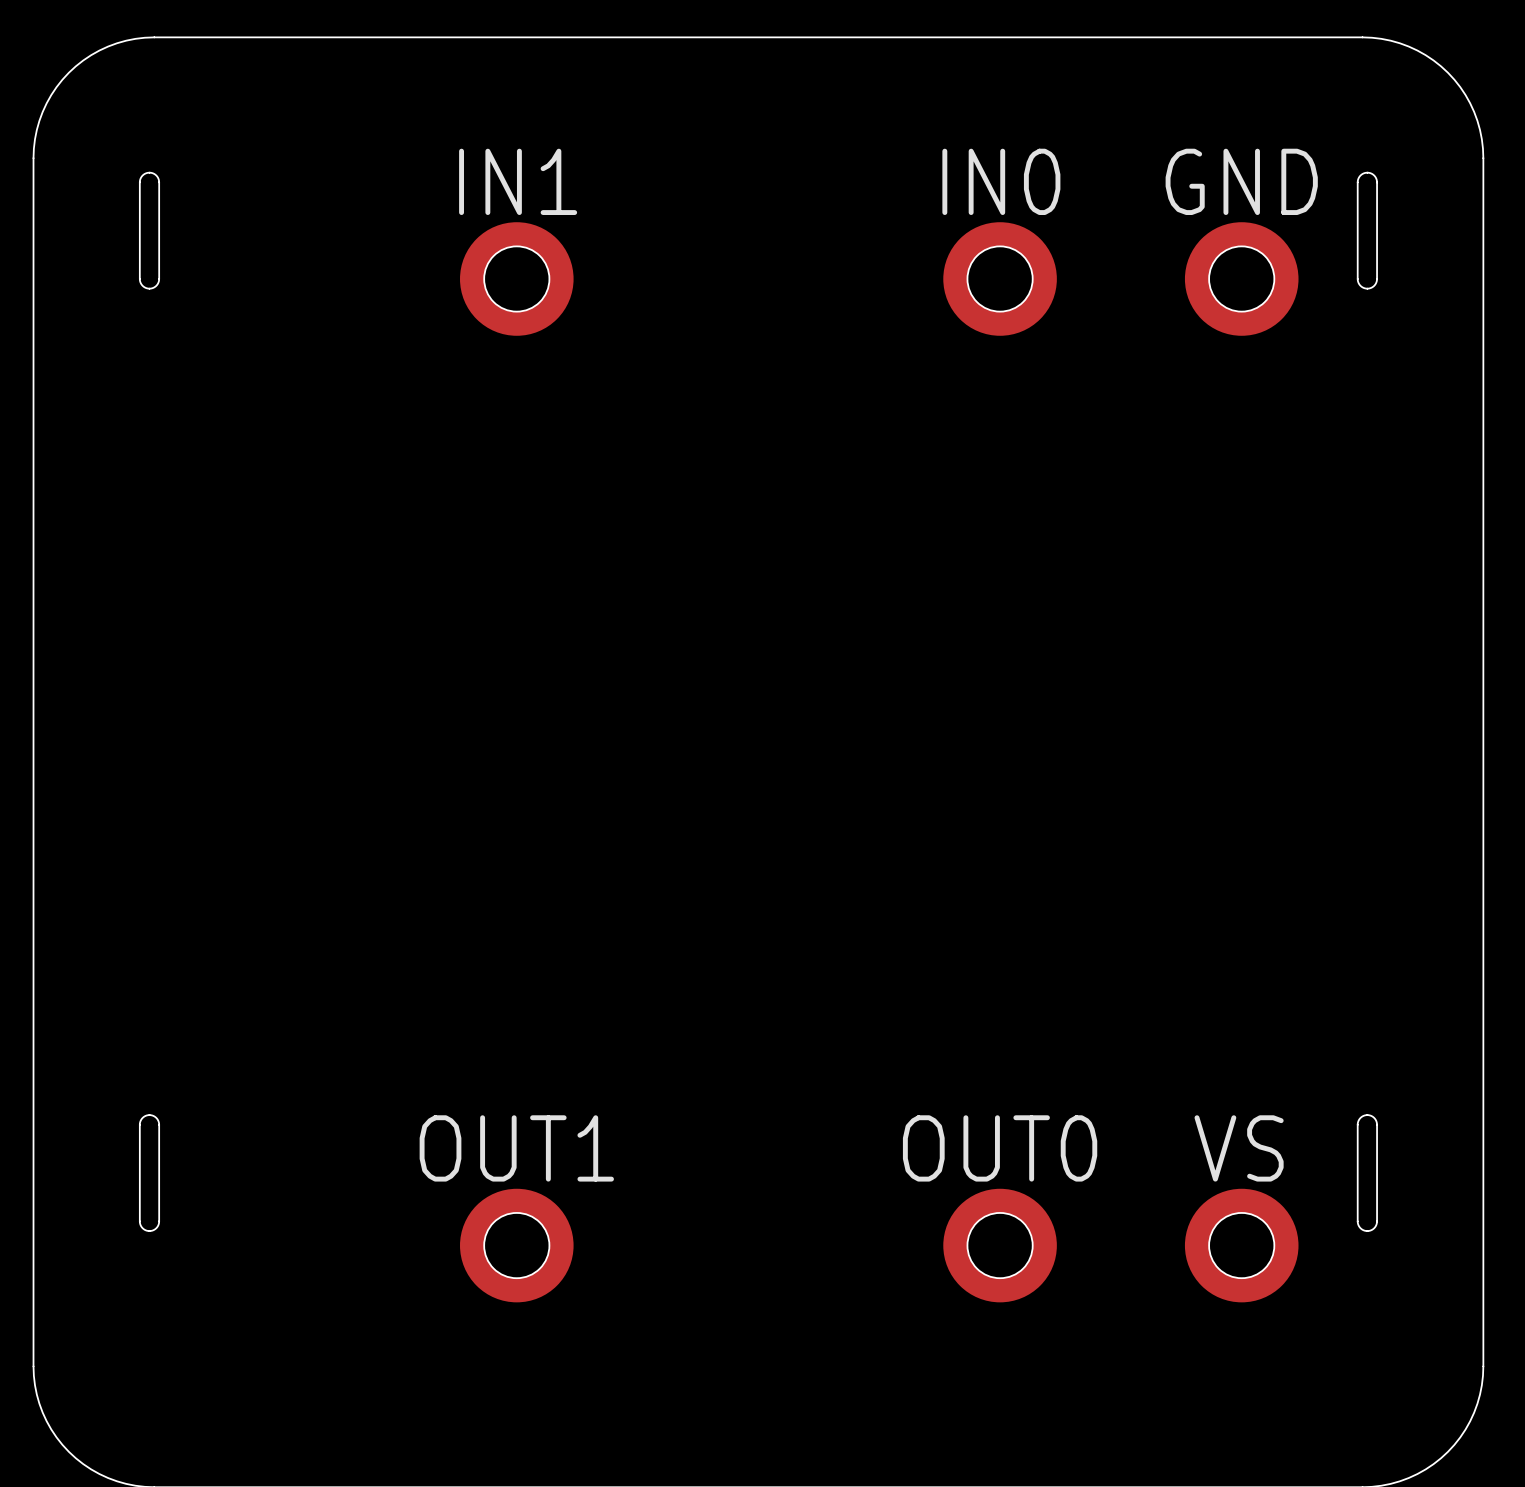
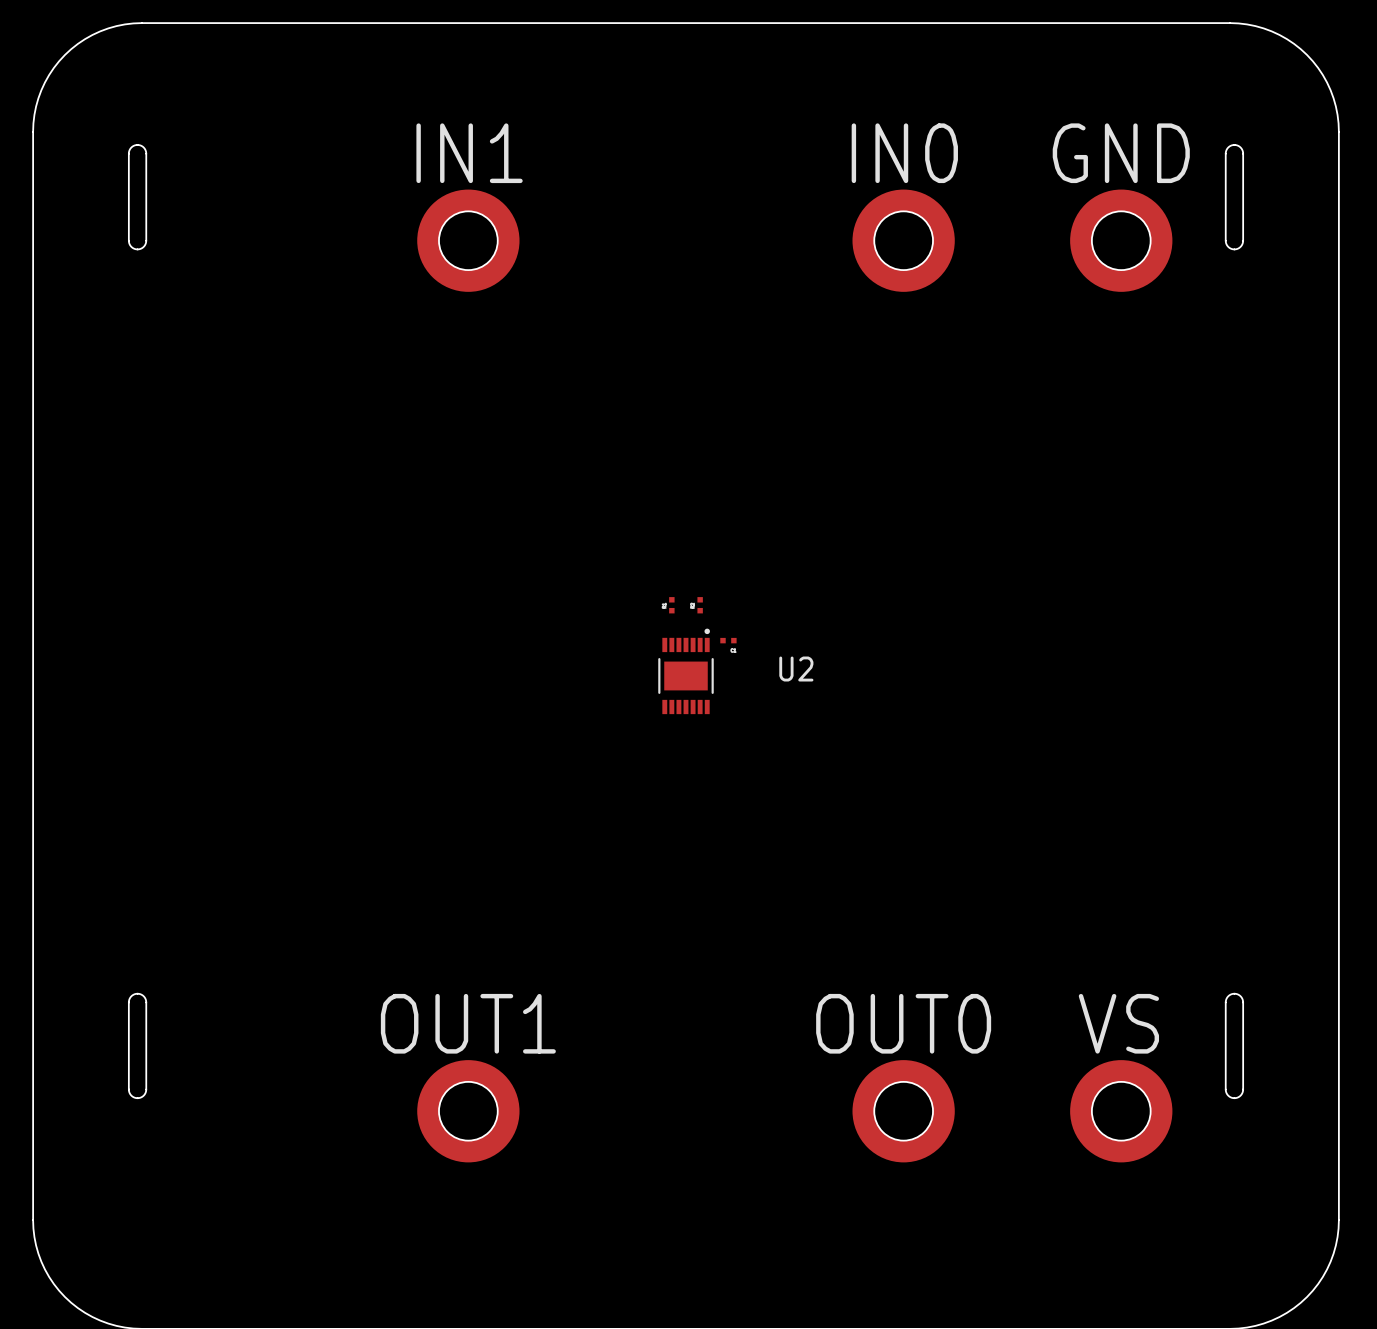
part: none -> (671, 605)
part: none -> (700, 605)
part: none -> (728, 640)
U2: none -> (686, 671)

